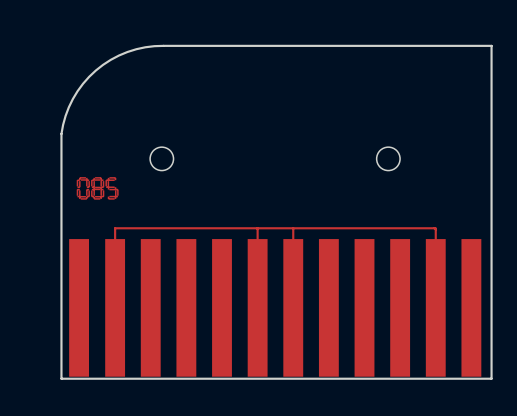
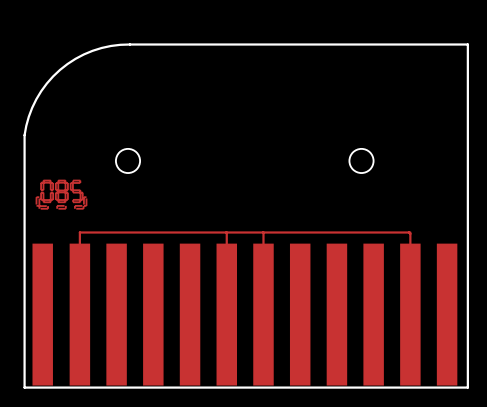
top zone outline: none -> (39, 197) (36, 197) (36, 205) (39, 205) (39, 197)
top zone outline: none -> (86, 197) (86, 205) (83, 205) (83, 197) (86, 197)
top zone outline: none -> (48, 206) (48, 208) (39, 208) (39, 206) (48, 206)
top zone outline: none -> (65, 205) (57, 205) (57, 208) (65, 208) (65, 205)
top zone outline: none -> (83, 205) (74, 205) (74, 208) (83, 208) (83, 205)

